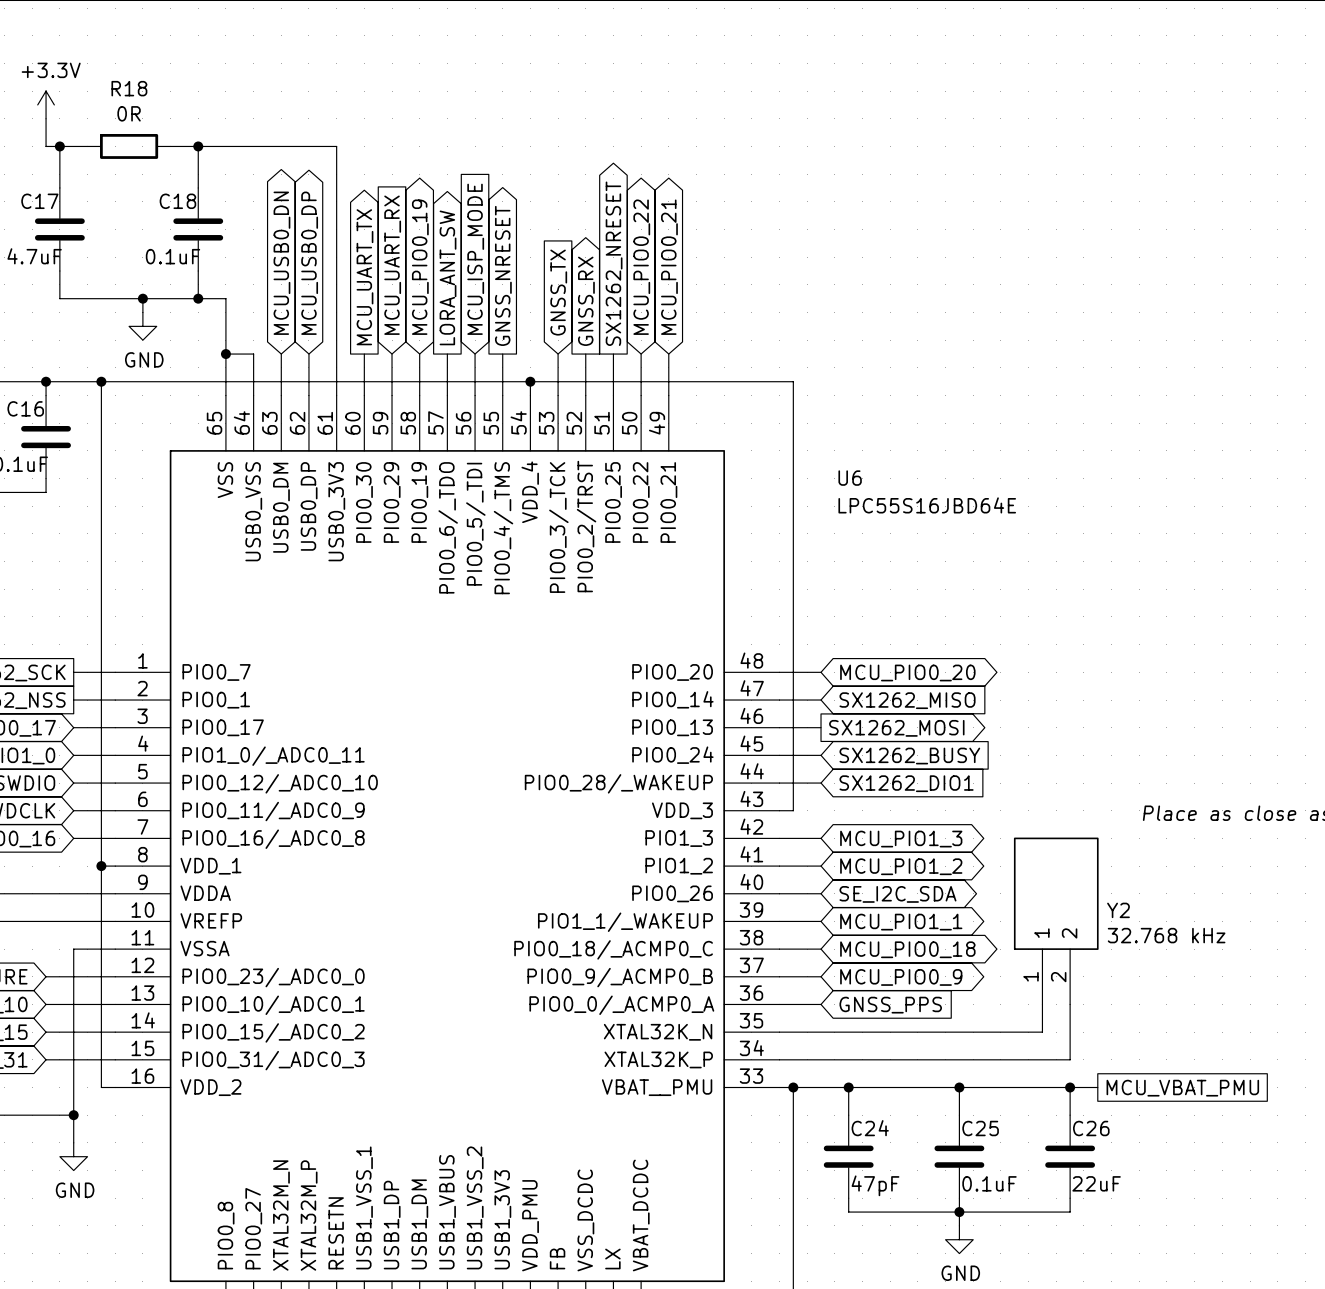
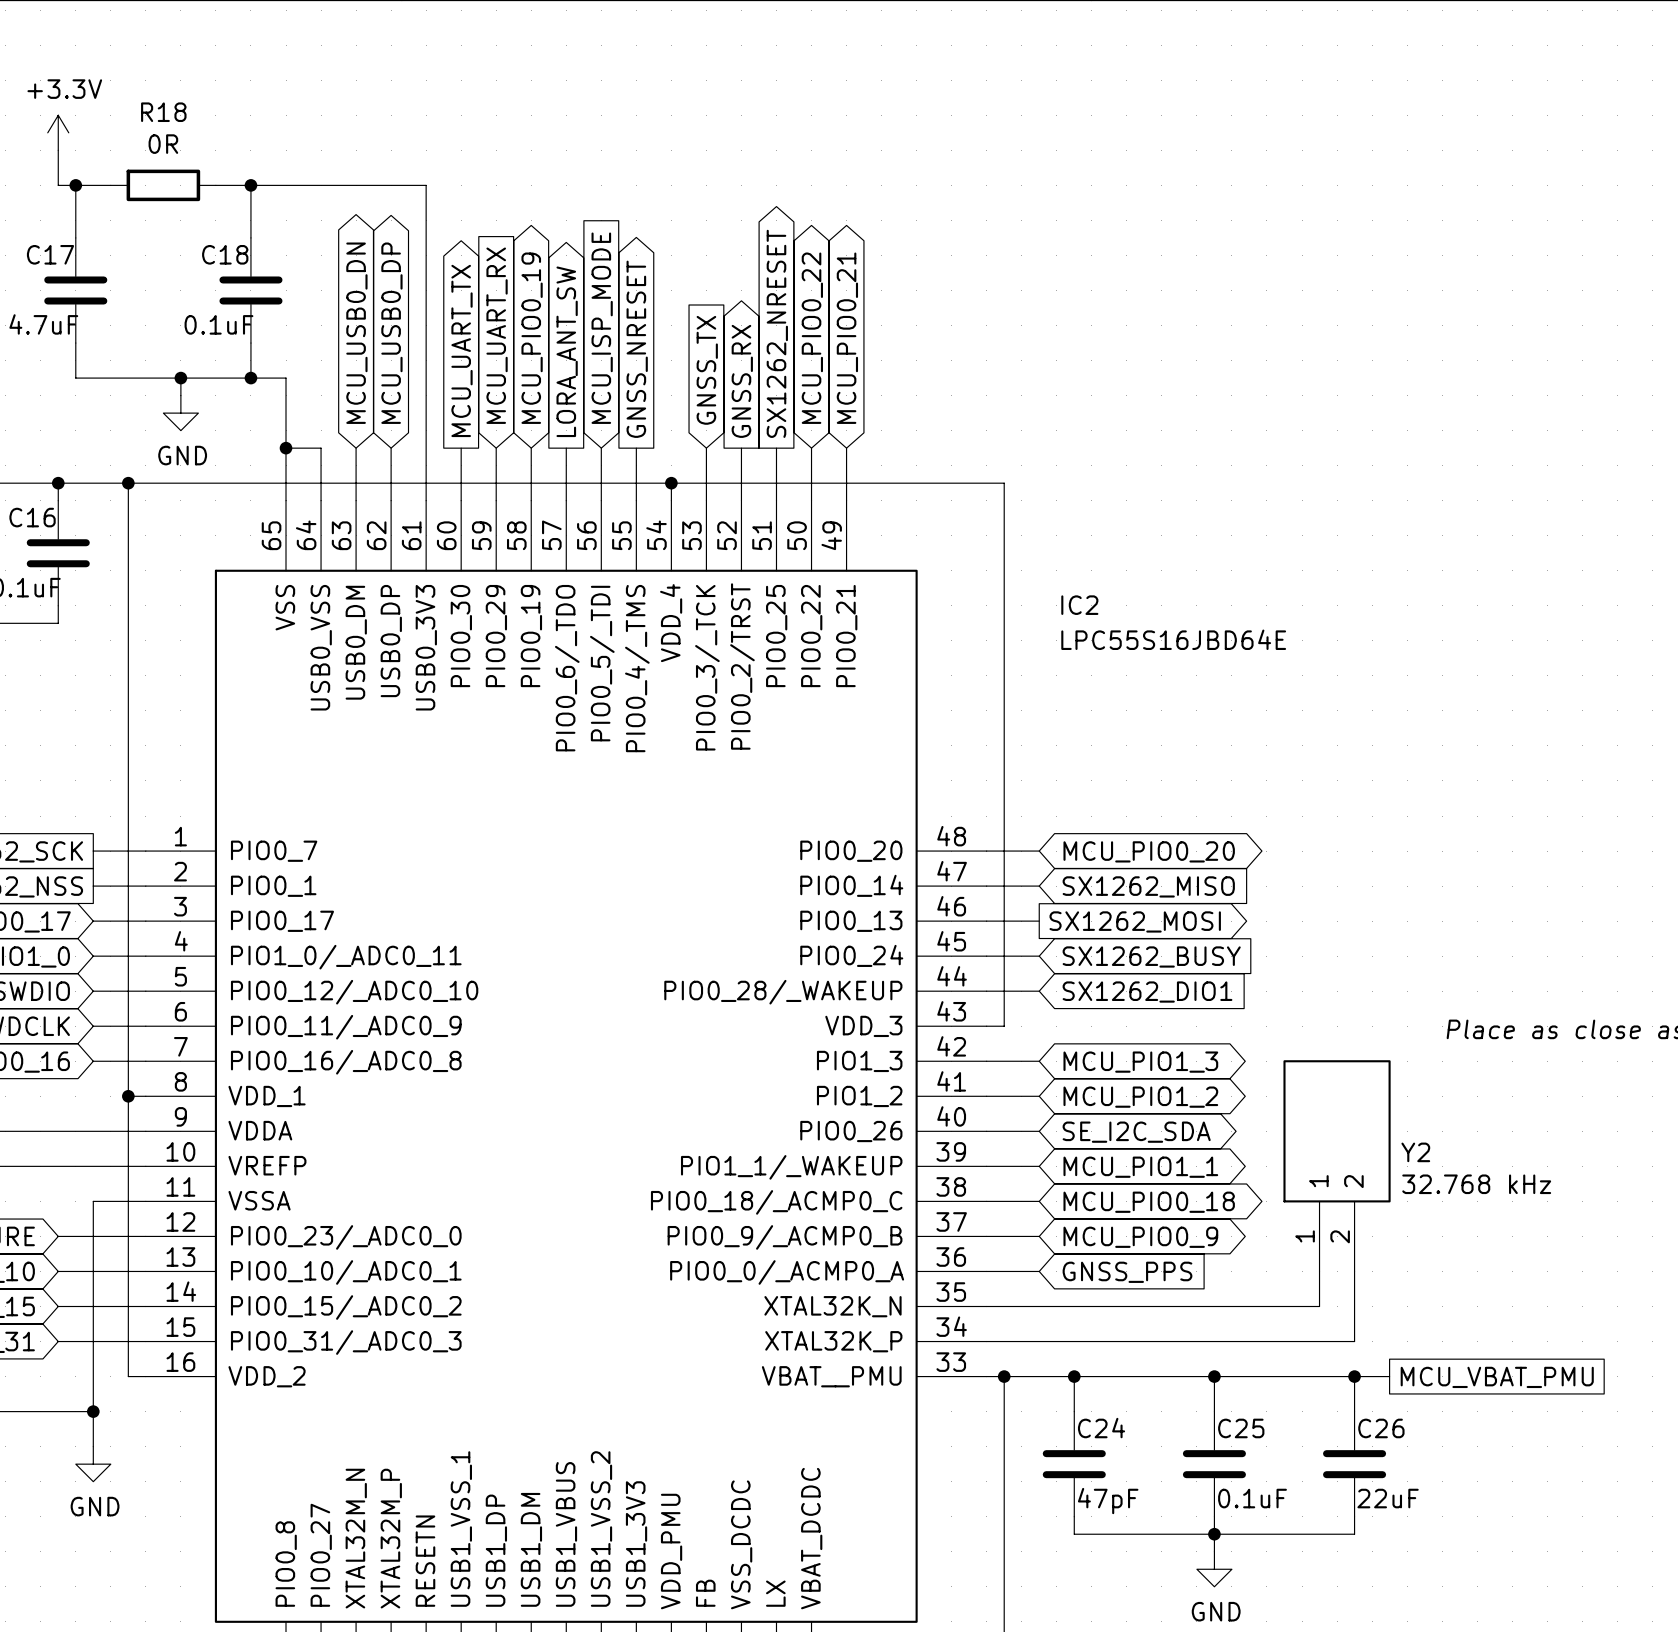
U6 name: U6 (850, 478) -> IC2 (1079, 605)

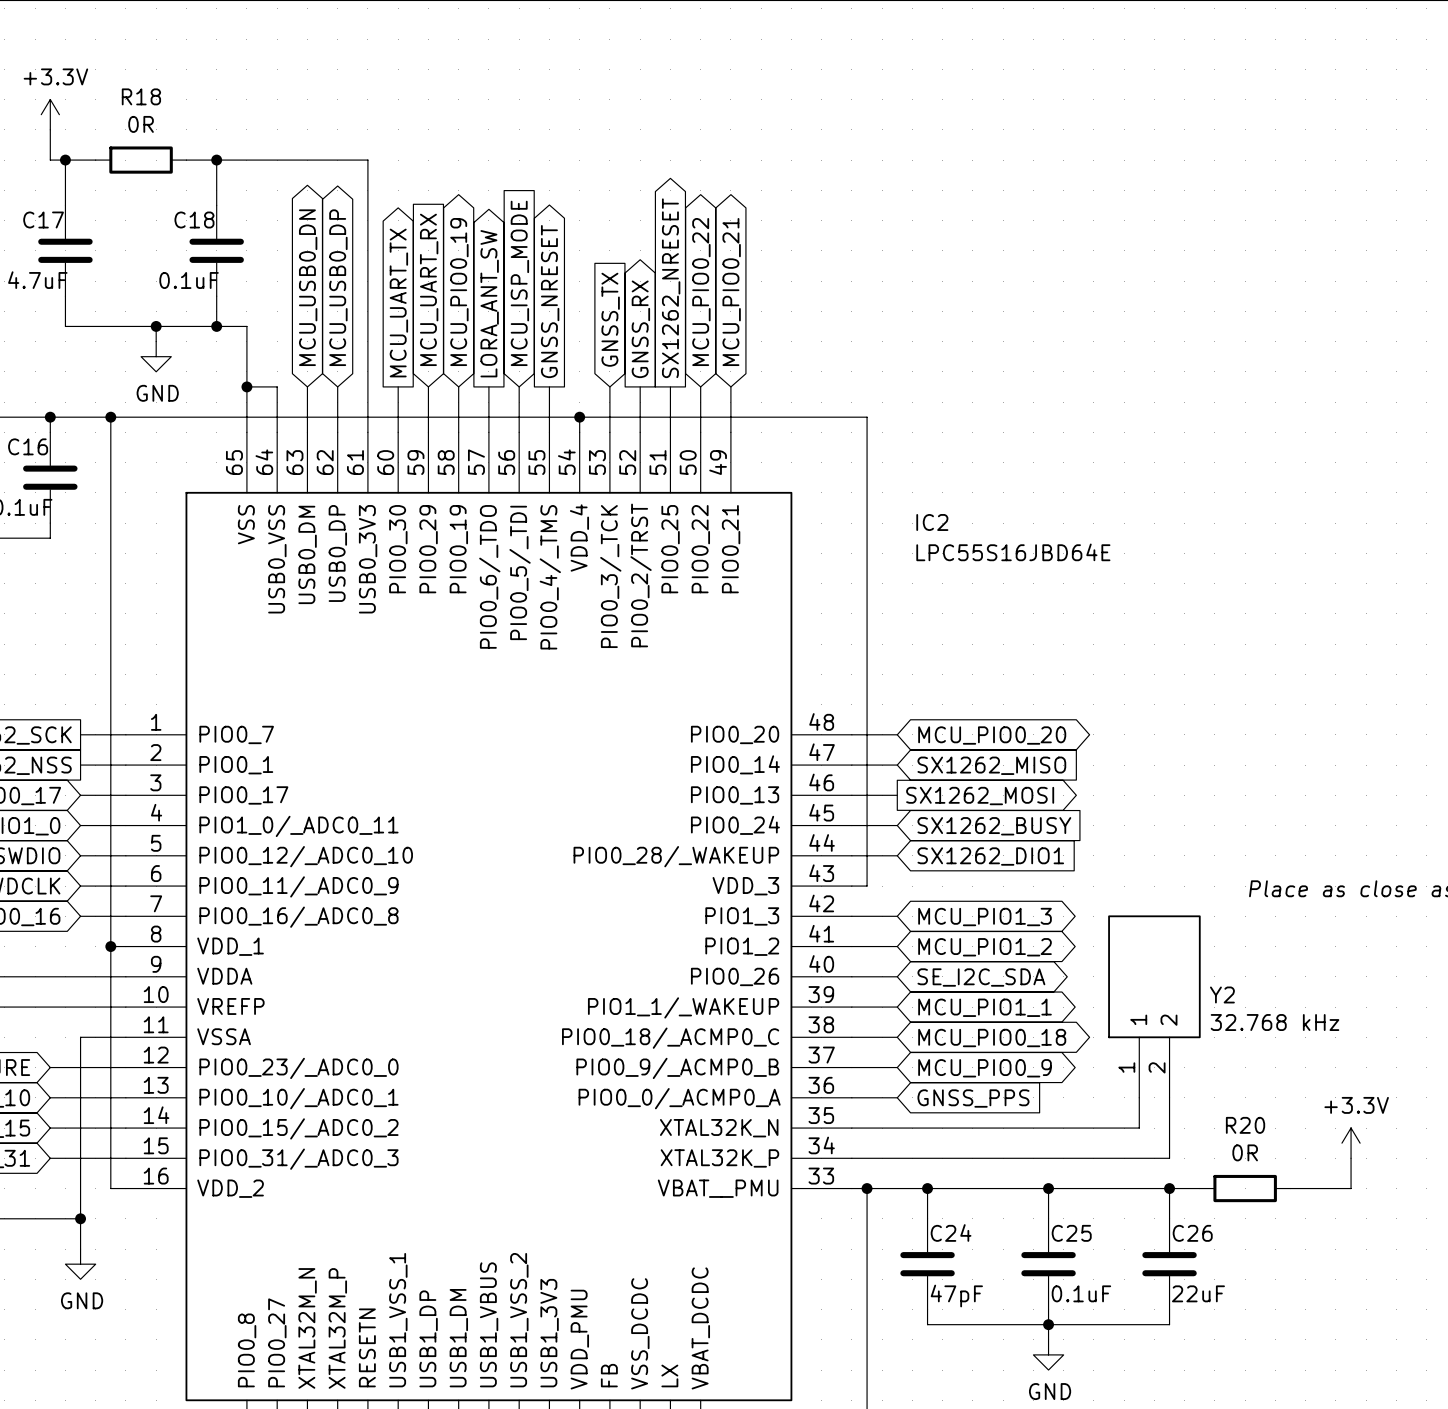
power symbol: none -> +3.3V (1351, 1143)
wire: none -> (1351, 1158) (1351, 1188) (1290, 1188)
R20: none -> 0R (1245, 1188)
global label: MCU_VBAT_PMU (1497, 1377) -> none

